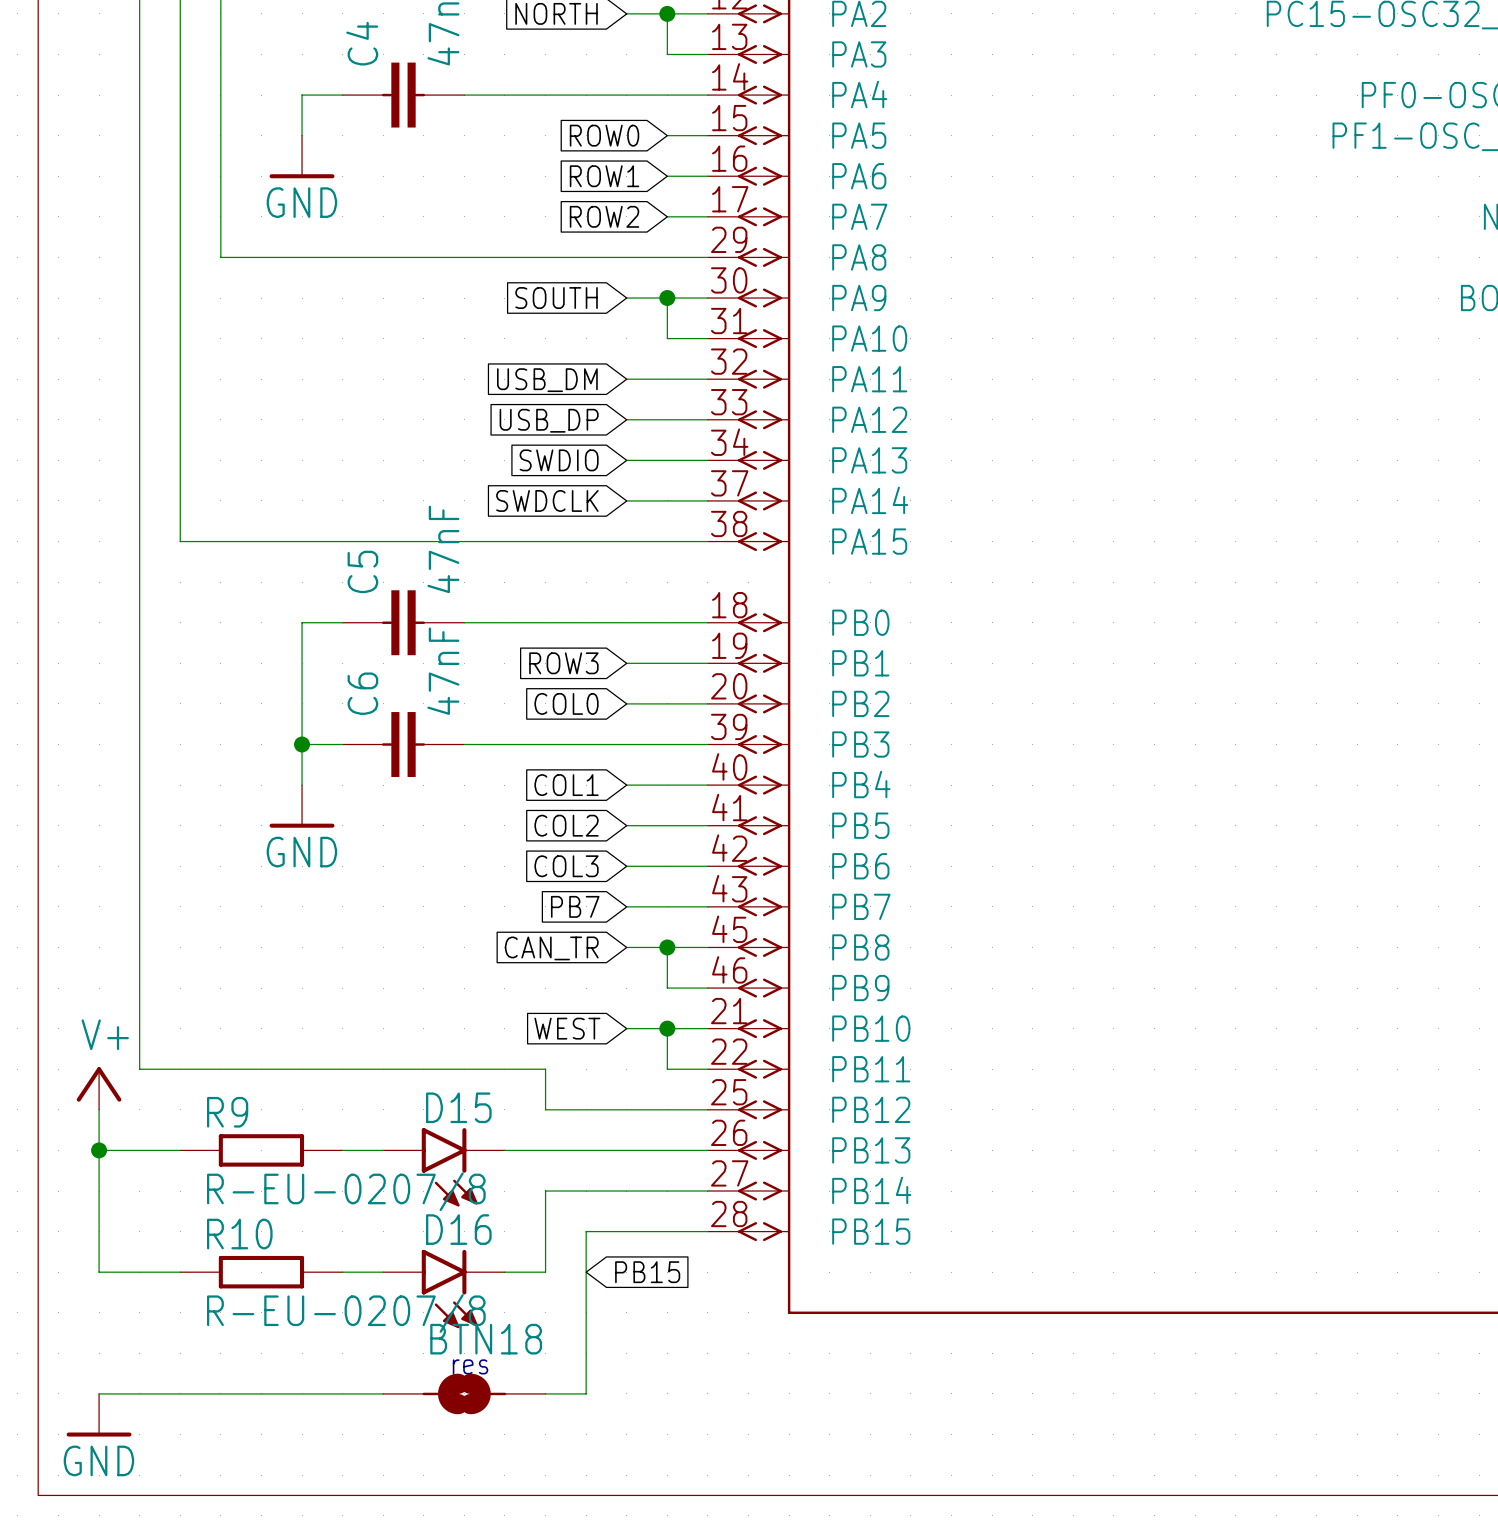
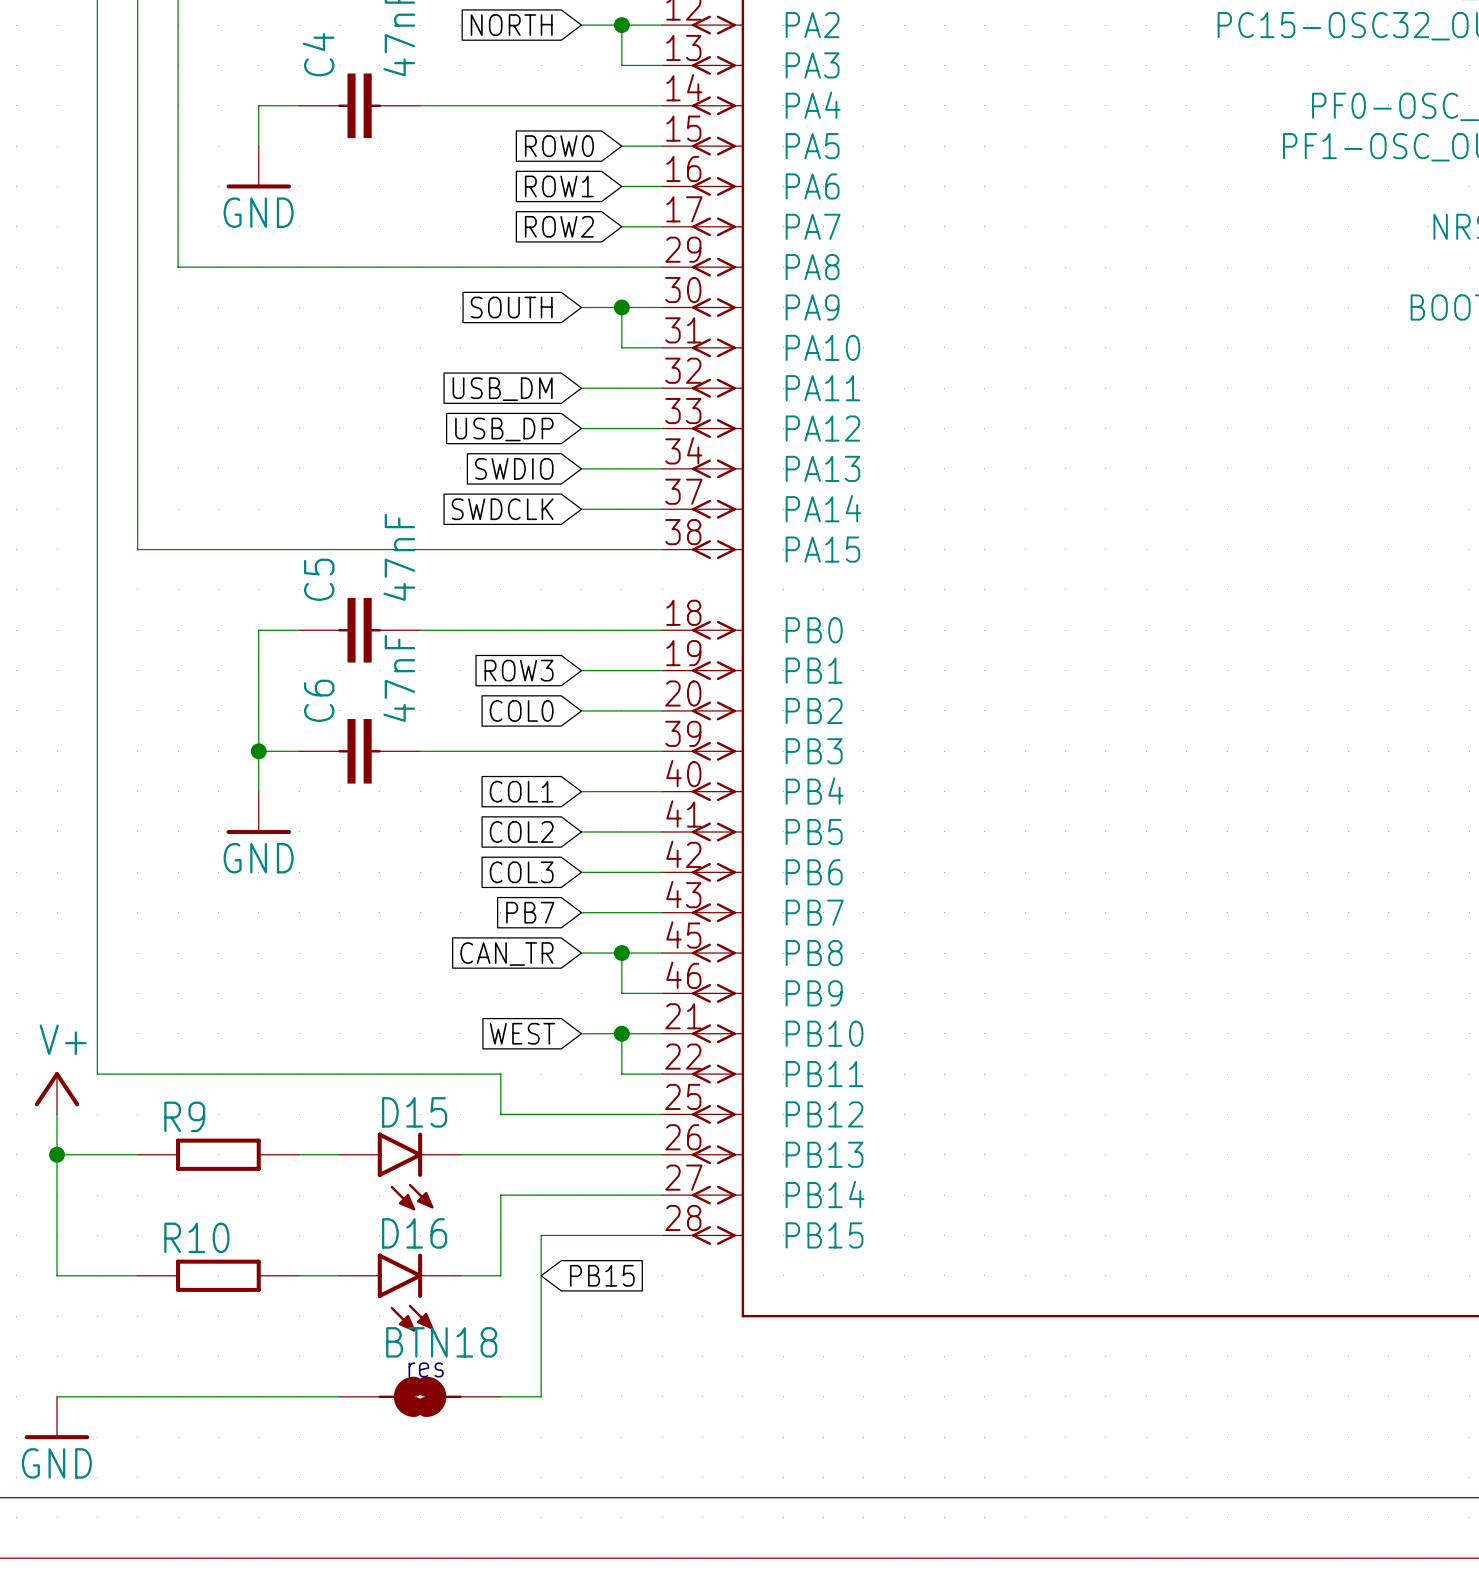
R9 value: R-EU-0207/8 (346, 1191) -> none
R10 value: R-EU-0207/8 (346, 1313) -> none

